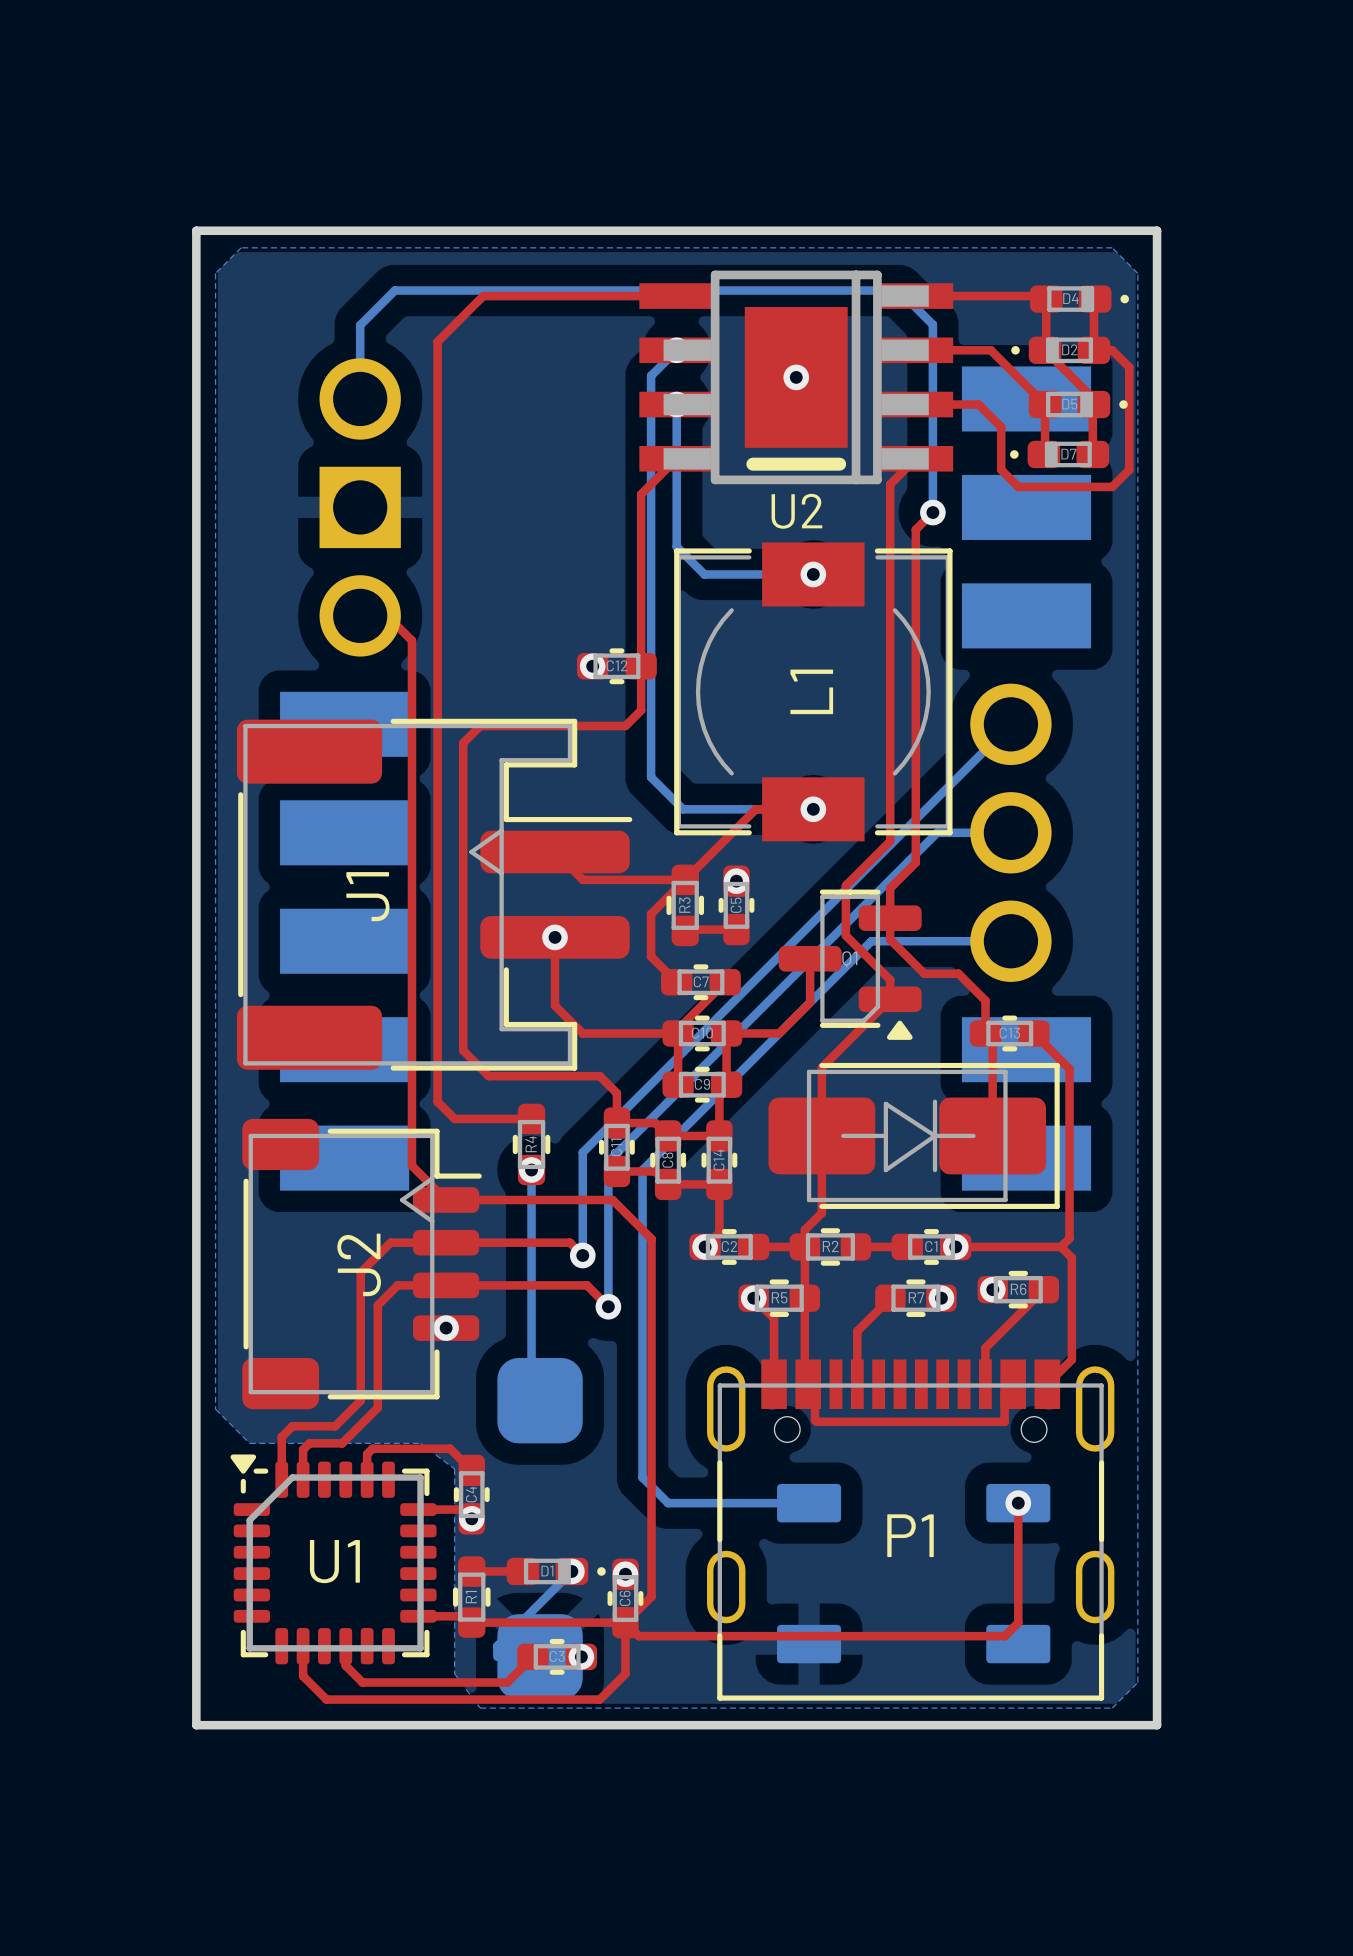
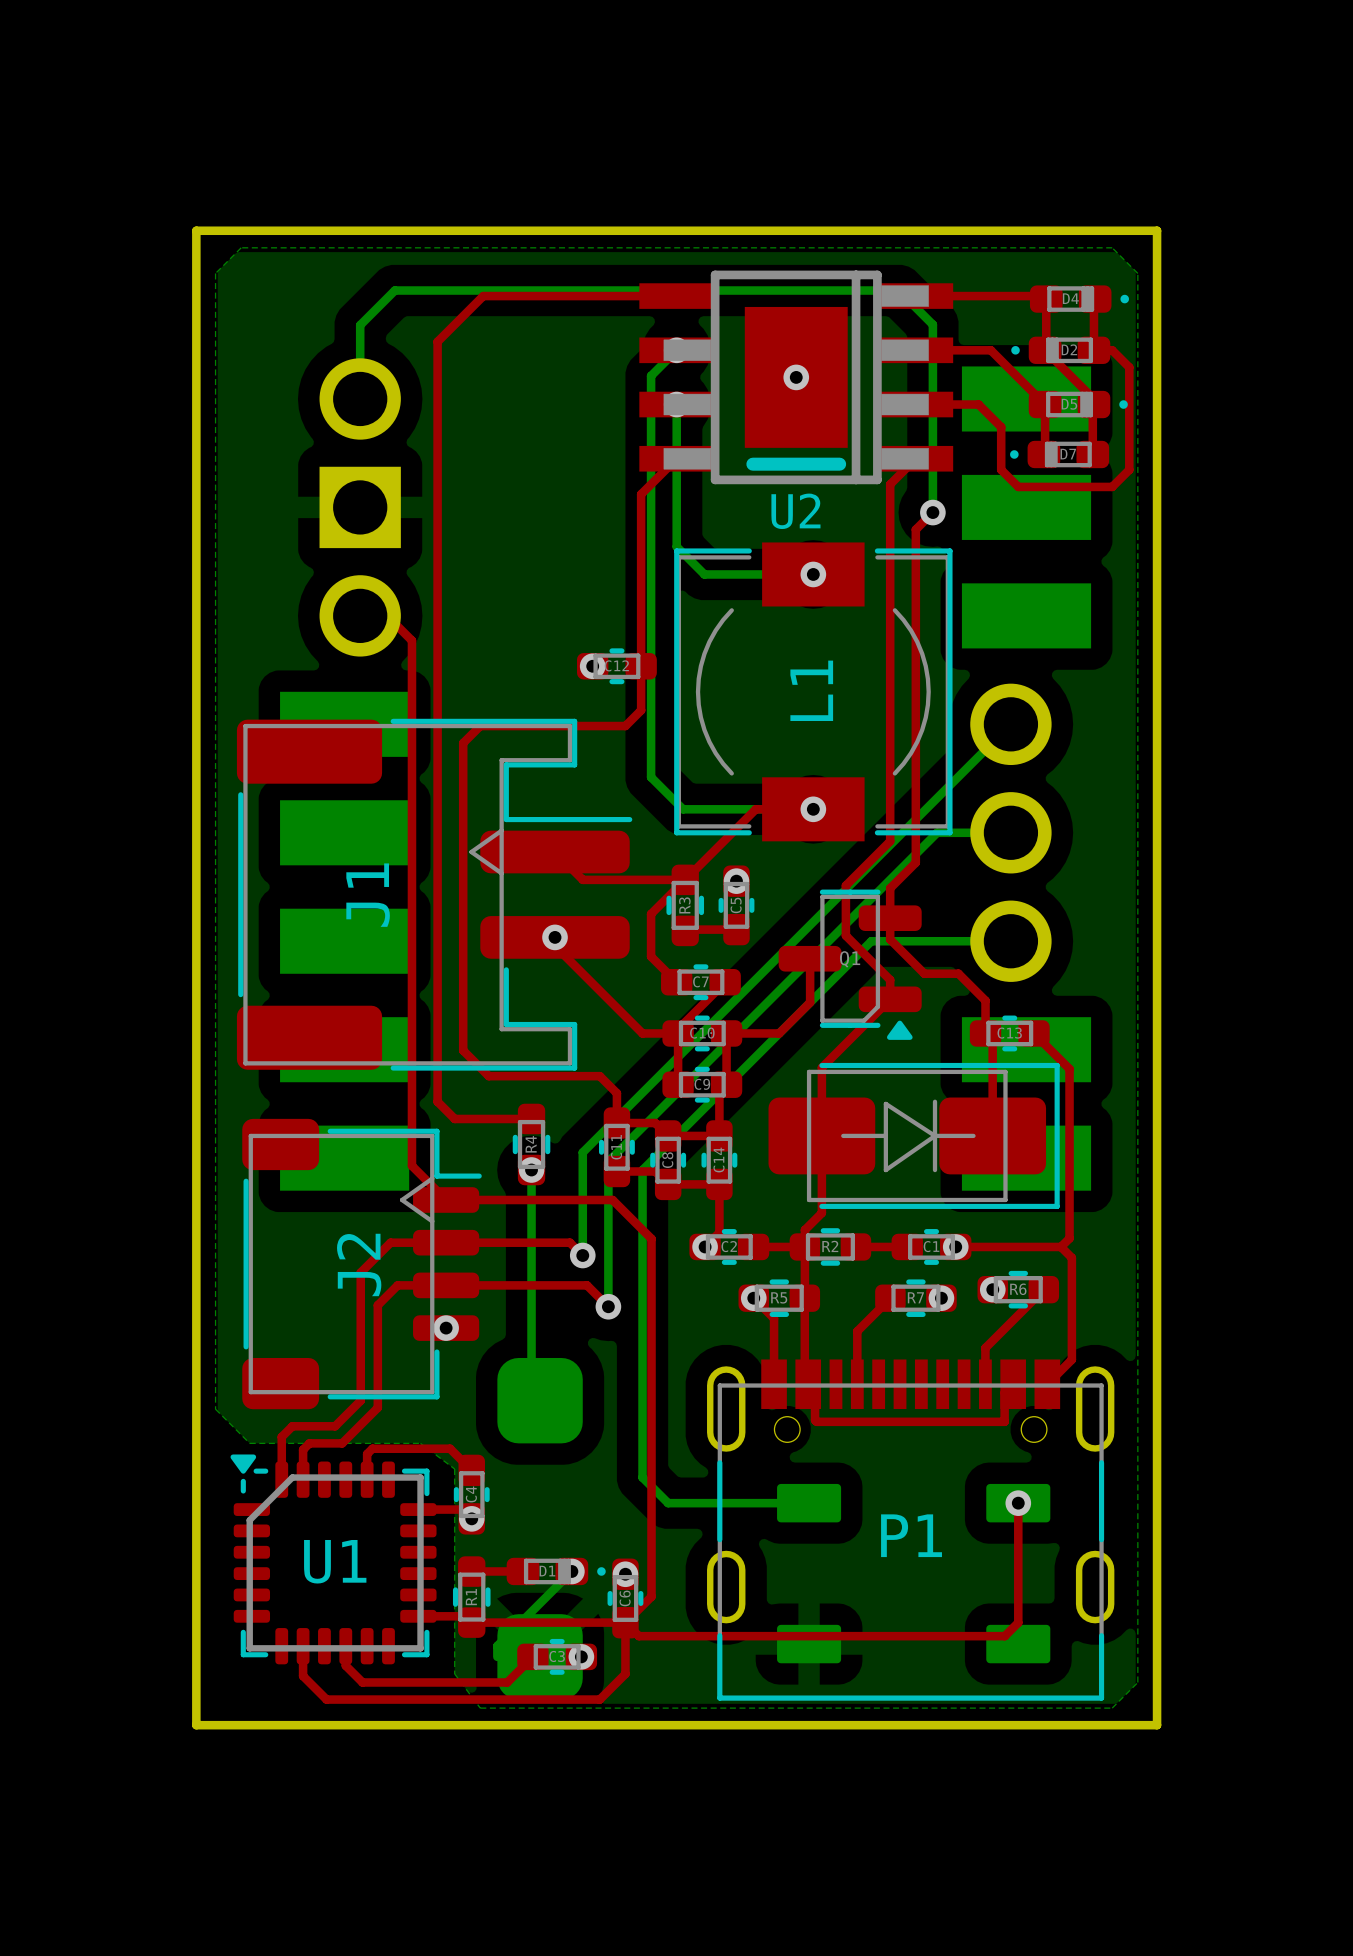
top track: (555, 945) (555, 1005) (582, 1033) (642, 1033) -> (555, 945) (642, 1033)

